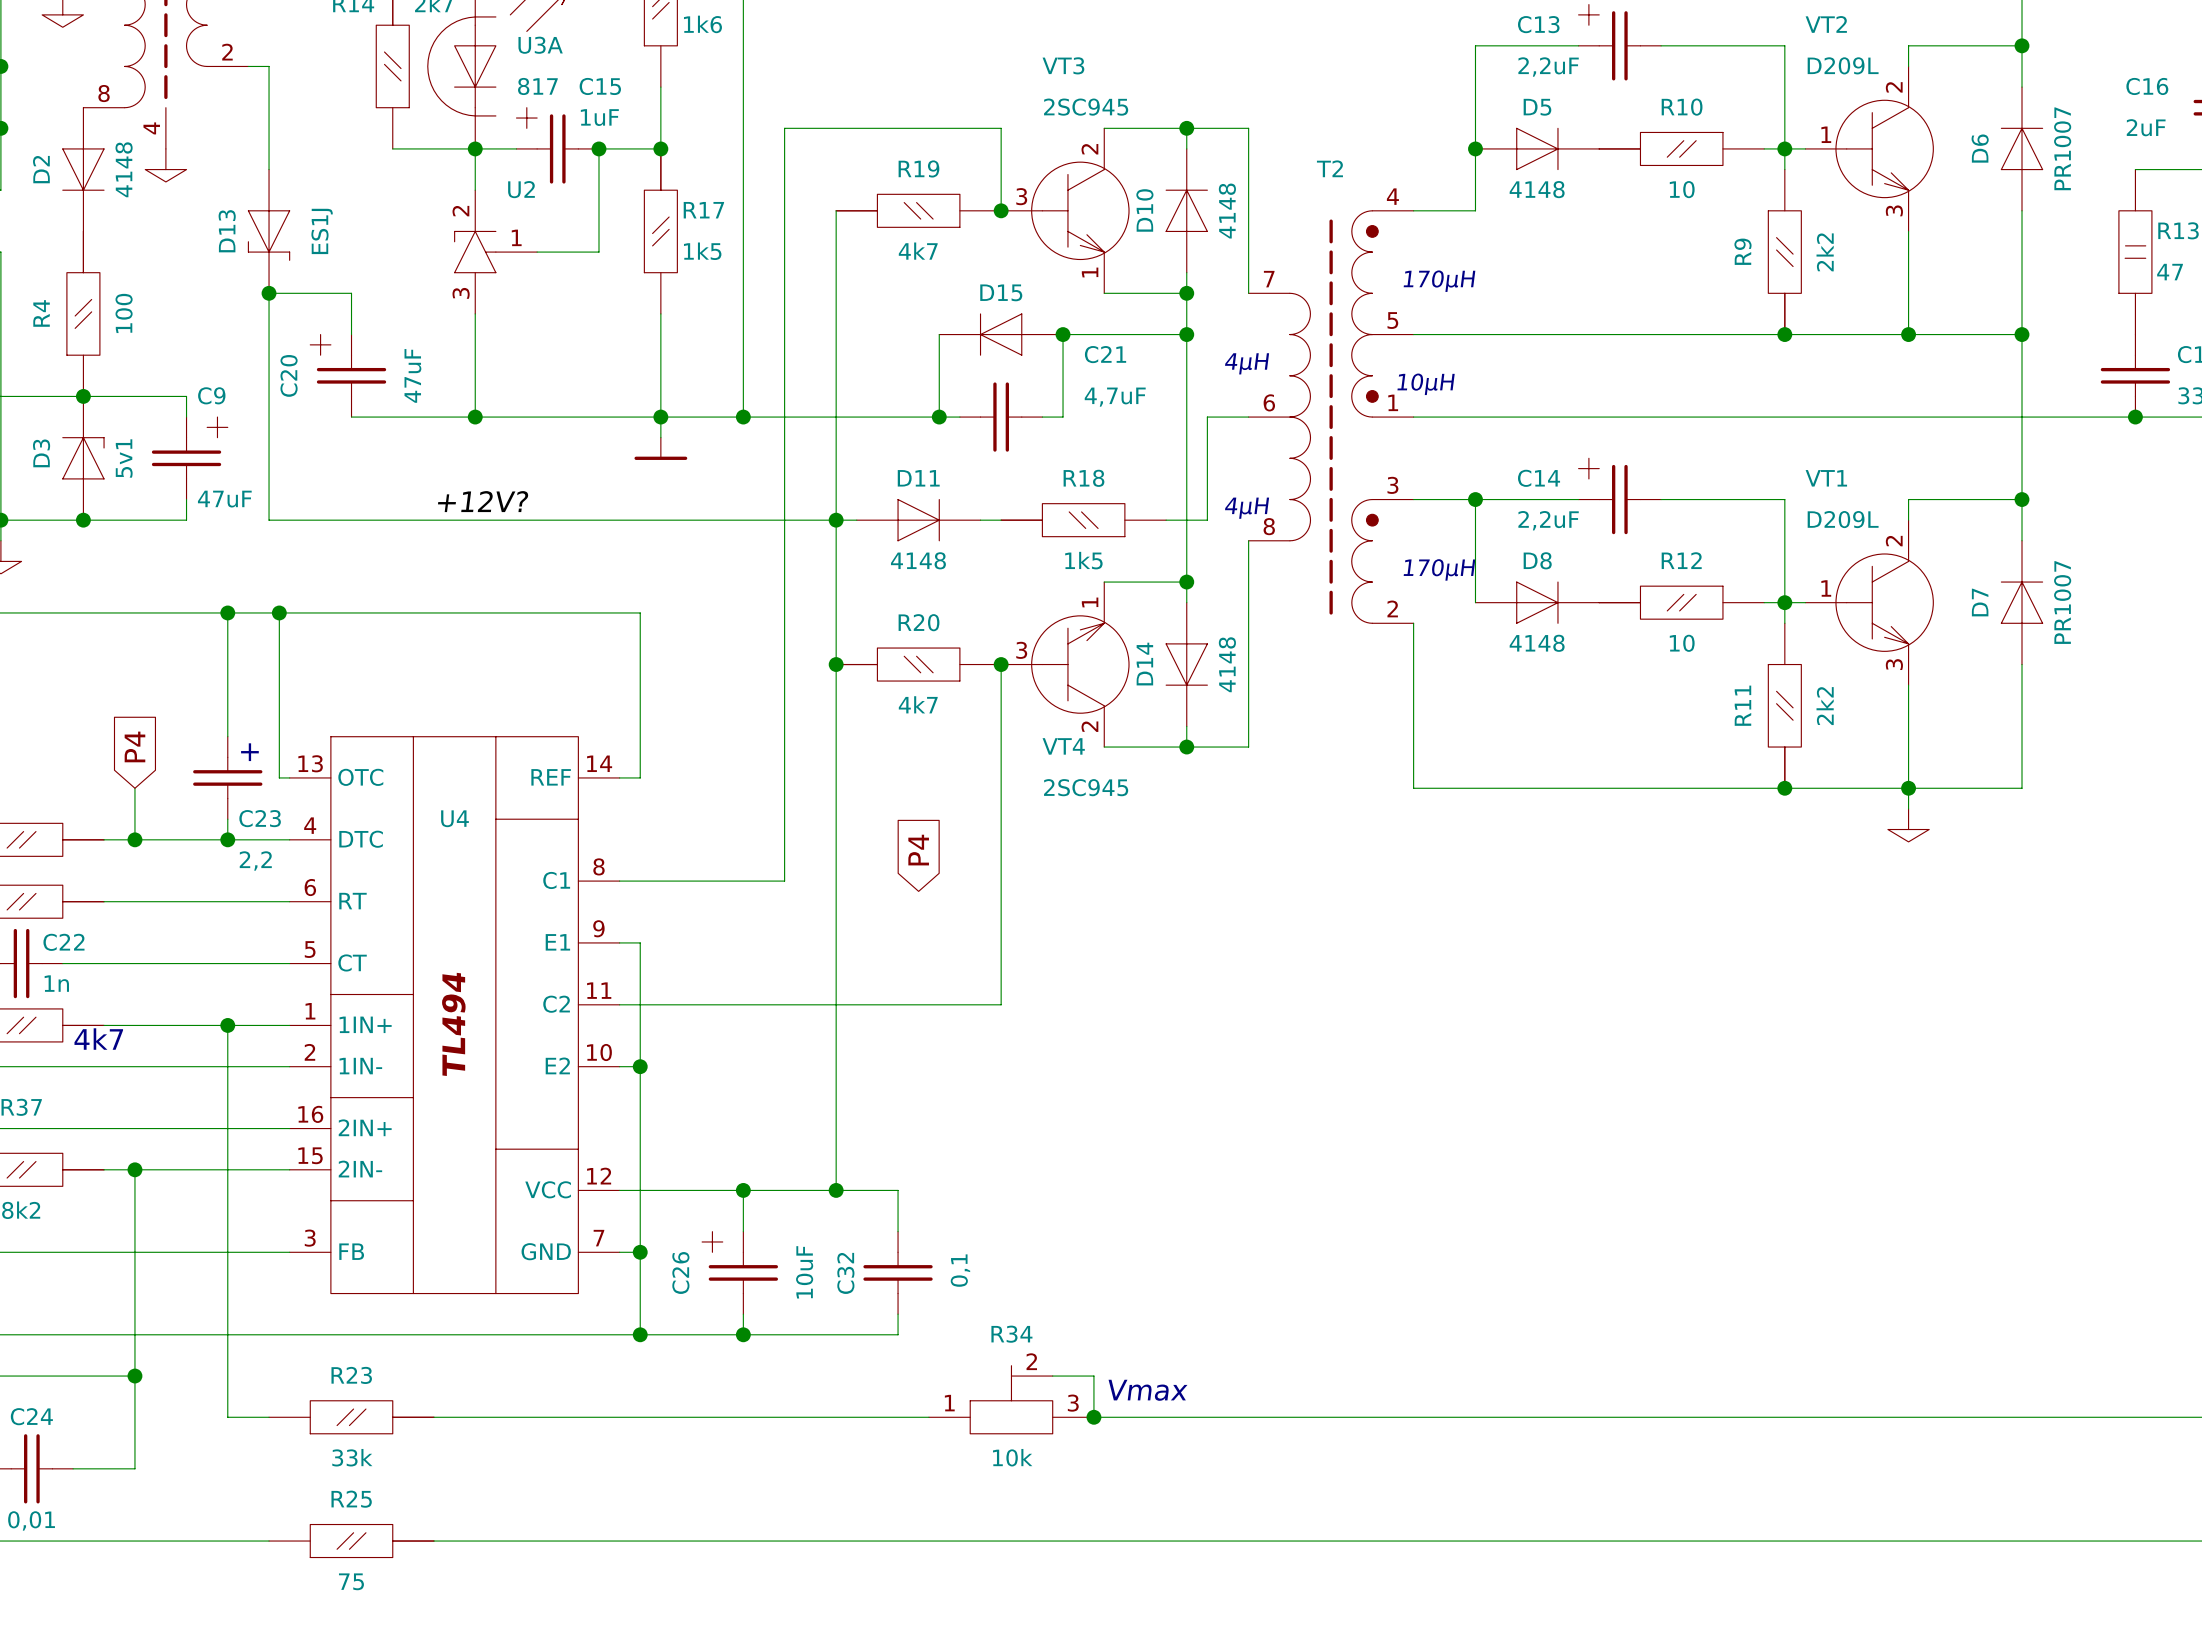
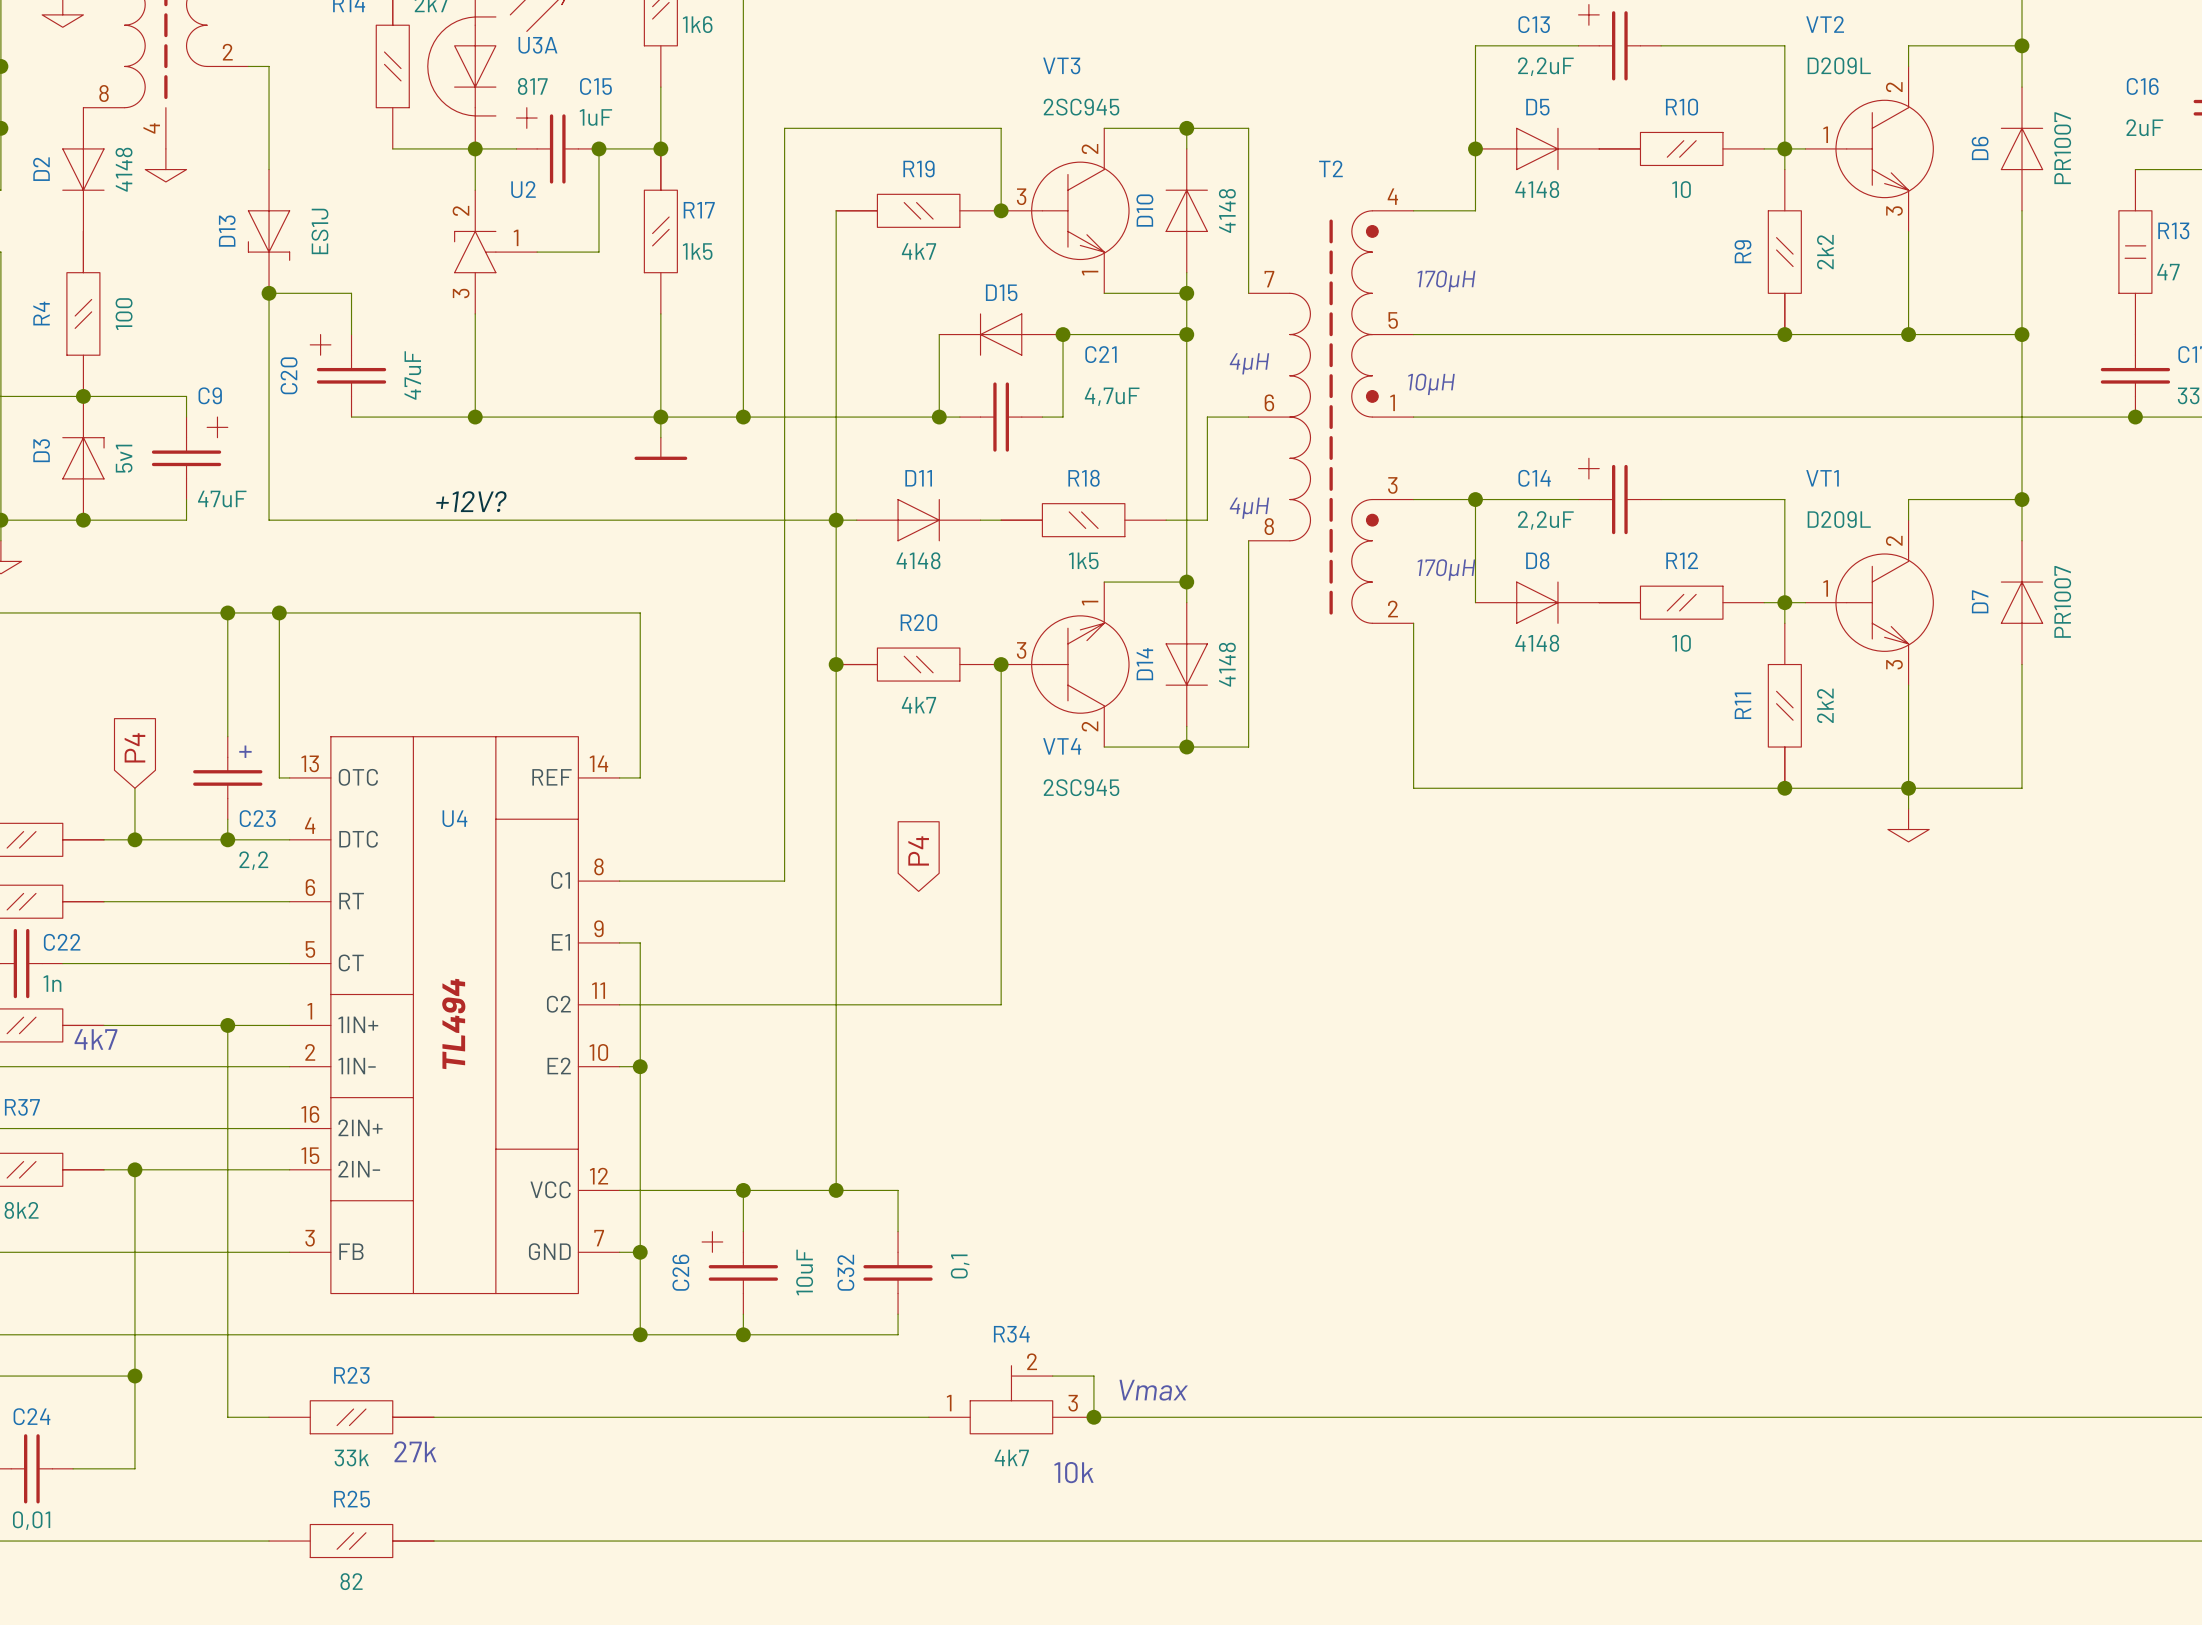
text: none -> 27k (415, 1451)
R34 value: 10k (1012, 1457) -> 4k7 (1011, 1457)
text: none -> 10k (1073, 1472)
R25 value: 75 (351, 1581) -> 82 (351, 1581)

